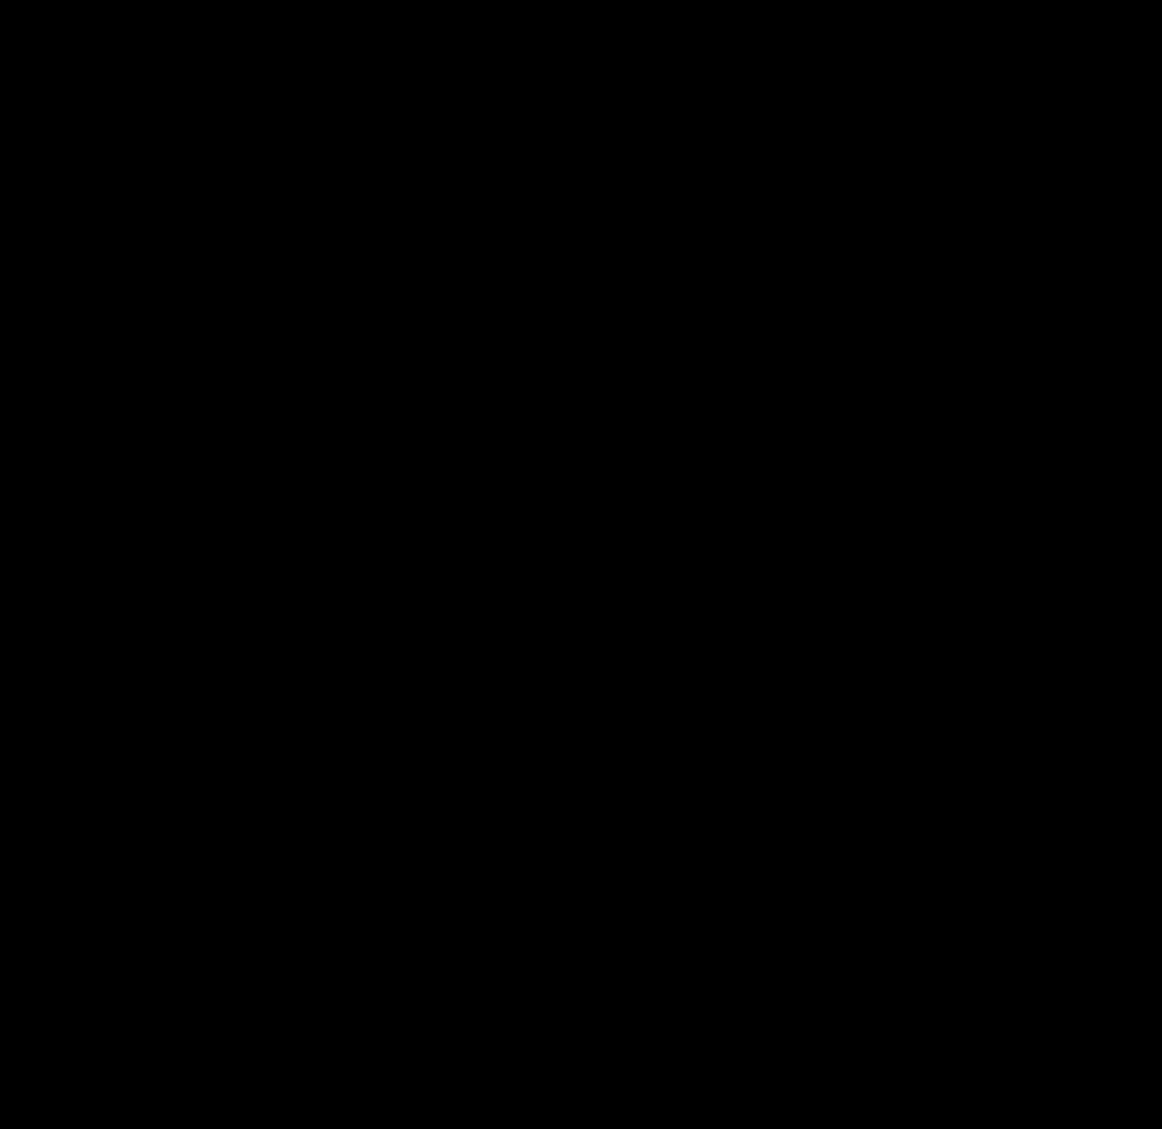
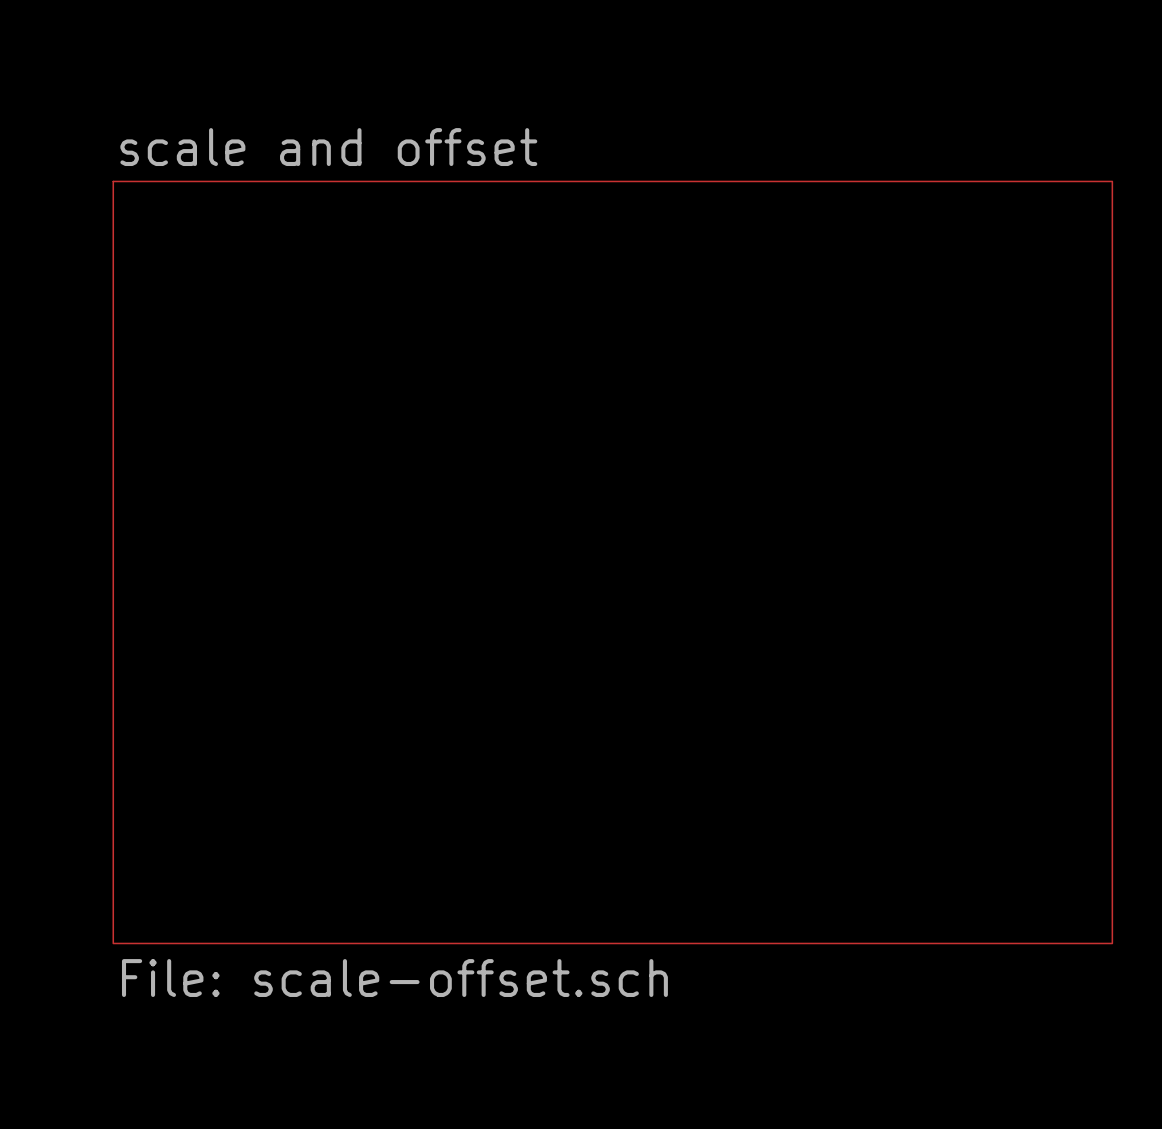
sheet scale and offset: none -> File: scale-offset.sch (612, 562)

